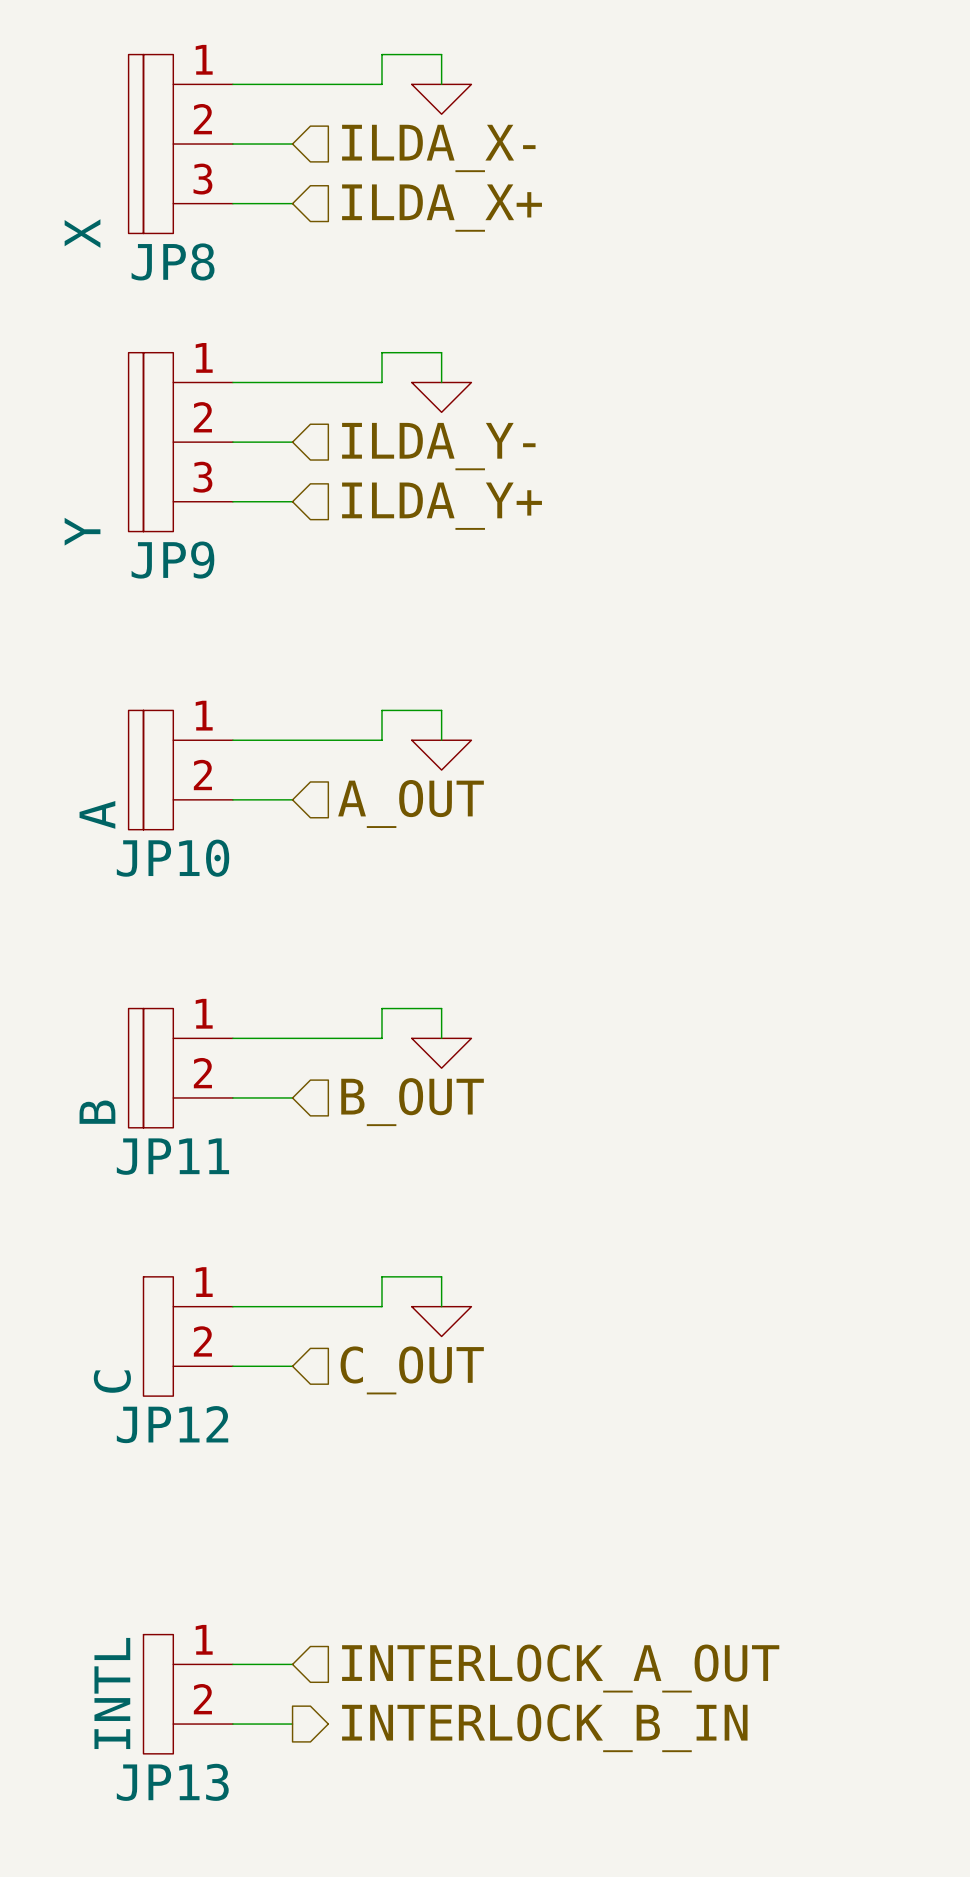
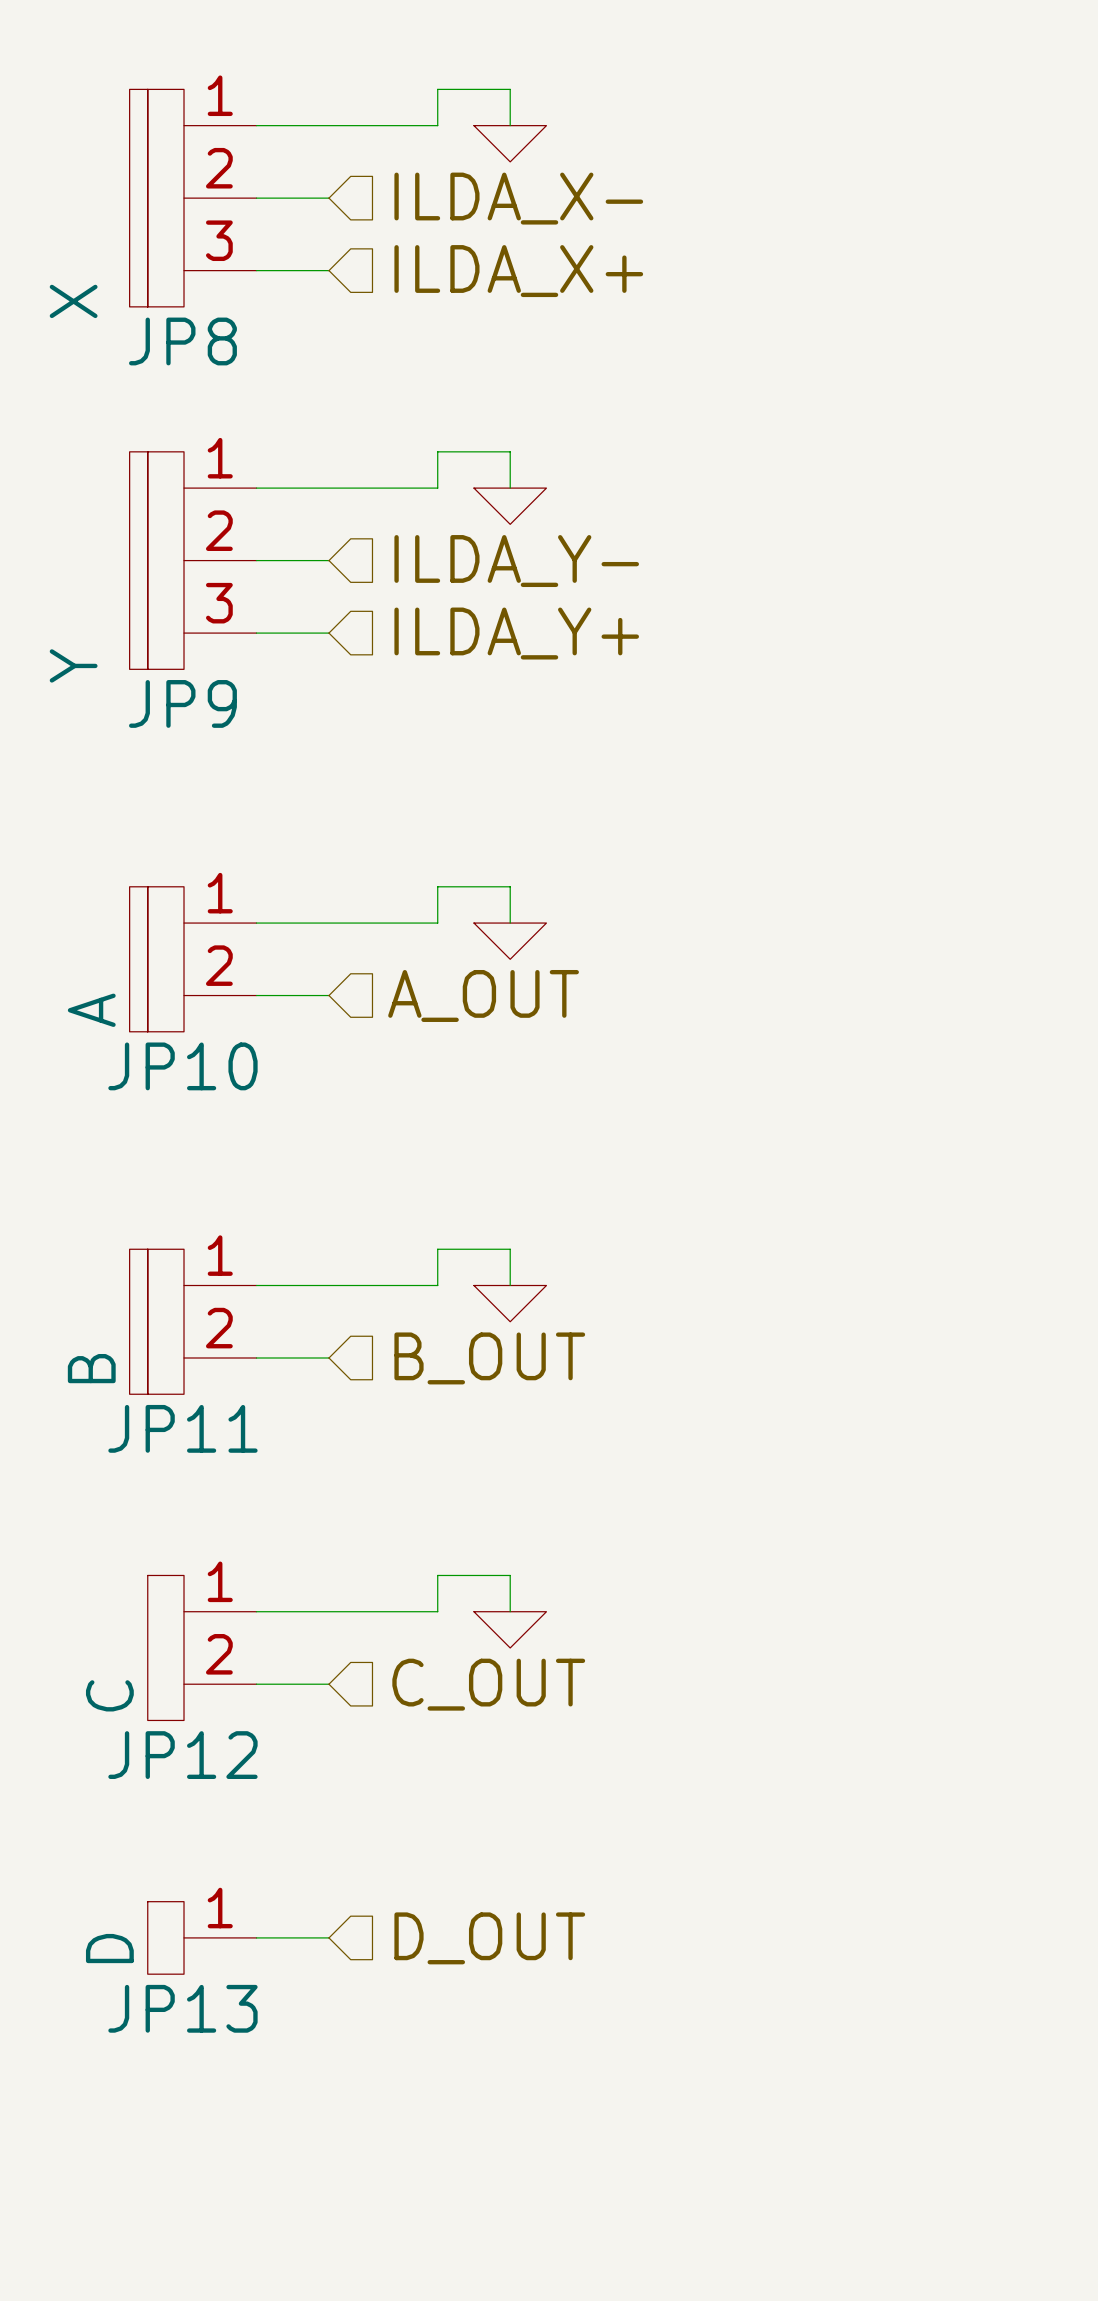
hierarchical label: none -> D_OUT (489, 1938)
JP13 symbol: [143, 1634, 233, 1754] -> [147, 1901, 257, 1975]
wire: (232, 1664) (292, 1664) -> (256, 1937) (328, 1937)
hierarchical label: INTERLOCK_A_OUT (560, 1668) -> none
JP13 value: INTL (112, 1693) -> D (109, 1948)
wire: (232, 1724) (292, 1724) -> none
hierarchical label: INTERLOCK_B_IN (544, 1728) -> none

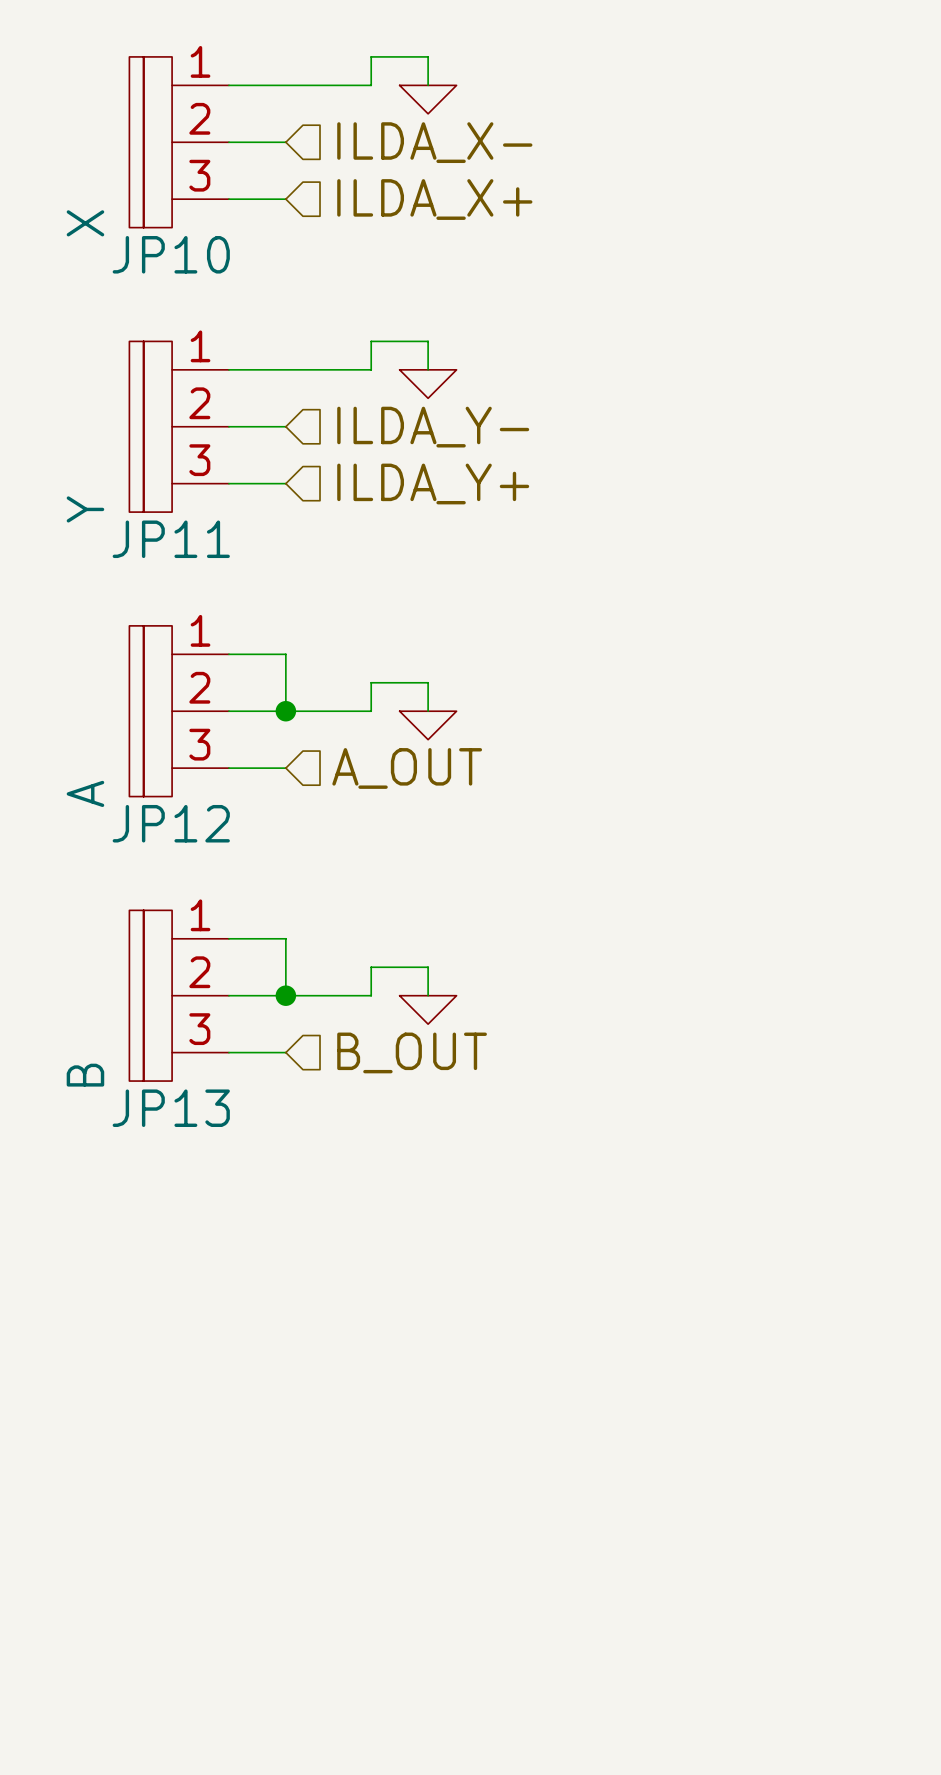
JP8 name: JP8 (182, 341) -> JP10 (171, 254)
JP9 name: JP9 (182, 703) -> JP11 (171, 539)
wire: none -> (228, 654) (285, 654) (285, 711)
junction: none -> (285, 711)
JP10: A (193, 959) -> none
wire: none -> (228, 938) (285, 938) (285, 995)
junction: none -> (285, 995)
JP11: B (193, 1321) -> none
JP12 symbol: [147, 1575, 257, 1721] -> [129, 625, 229, 797]
wire: (256, 1611) (437, 1611) (437, 1575) (510, 1575) (510, 1611) -> none
power symbol: (510, 1629) -> none
wire: (256, 1684) (328, 1684) -> none
hierarchical label: C_OUT (488, 1684) -> none
JP12 value: C (109, 1695) -> A (85, 793)
JP13 symbol: [147, 1901, 257, 1975] -> [129, 910, 229, 1082]
wire: (256, 1937) (328, 1937) -> none
hierarchical label: D_OUT (489, 1938) -> none
JP13 value: D (109, 1948) -> B (85, 1075)
JP13 name position: JP13 (182, 2008) -> JP13 (171, 1108)

